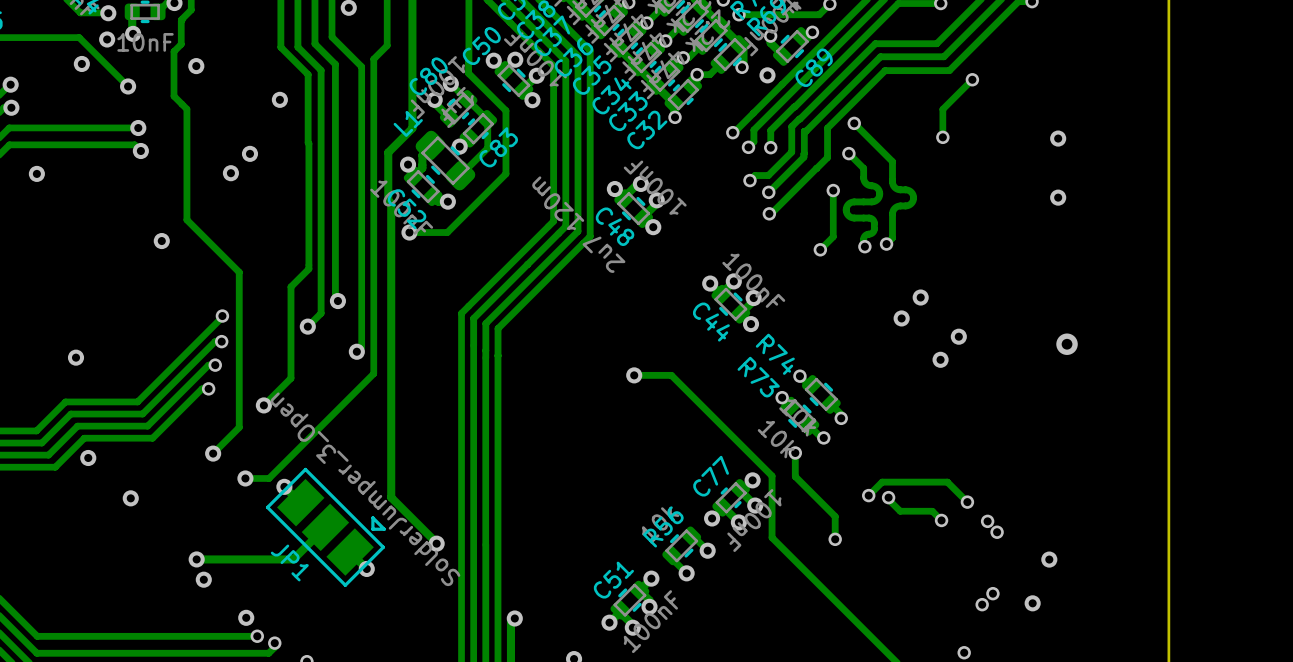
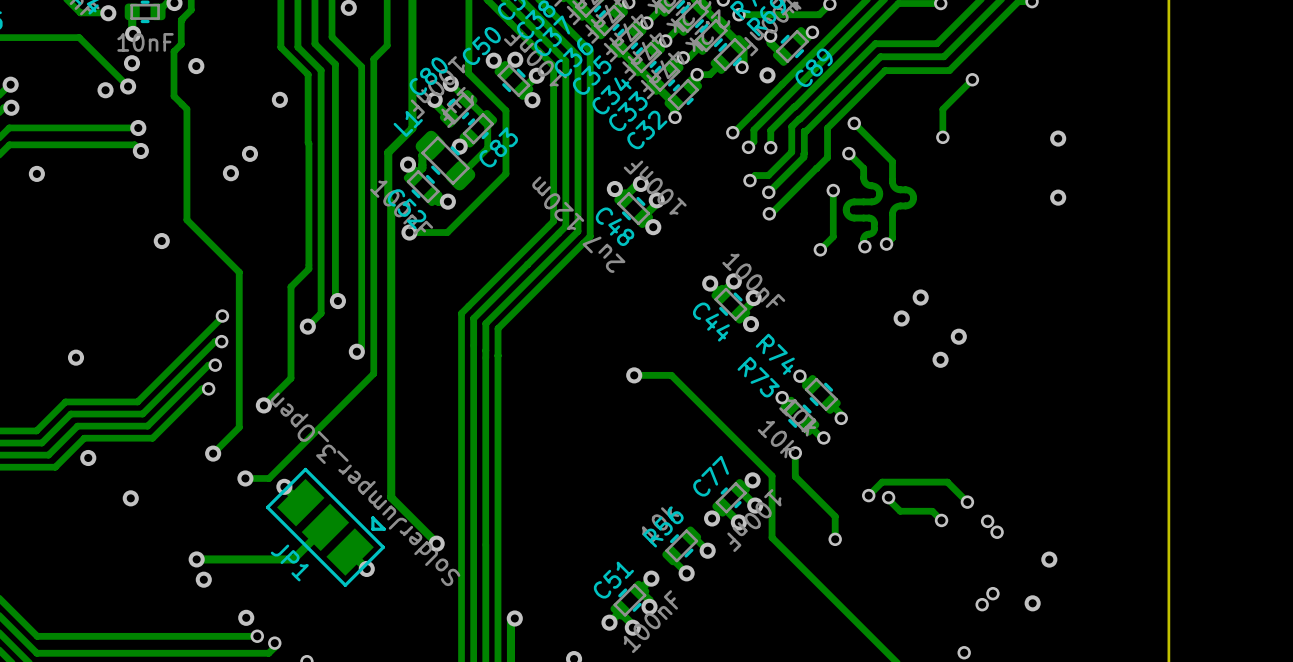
via: (107, 39) -> none
via: (81, 63) -> none
via: none -> (132, 63)
via: none -> (105, 90)
via: (1067, 344) -> none

